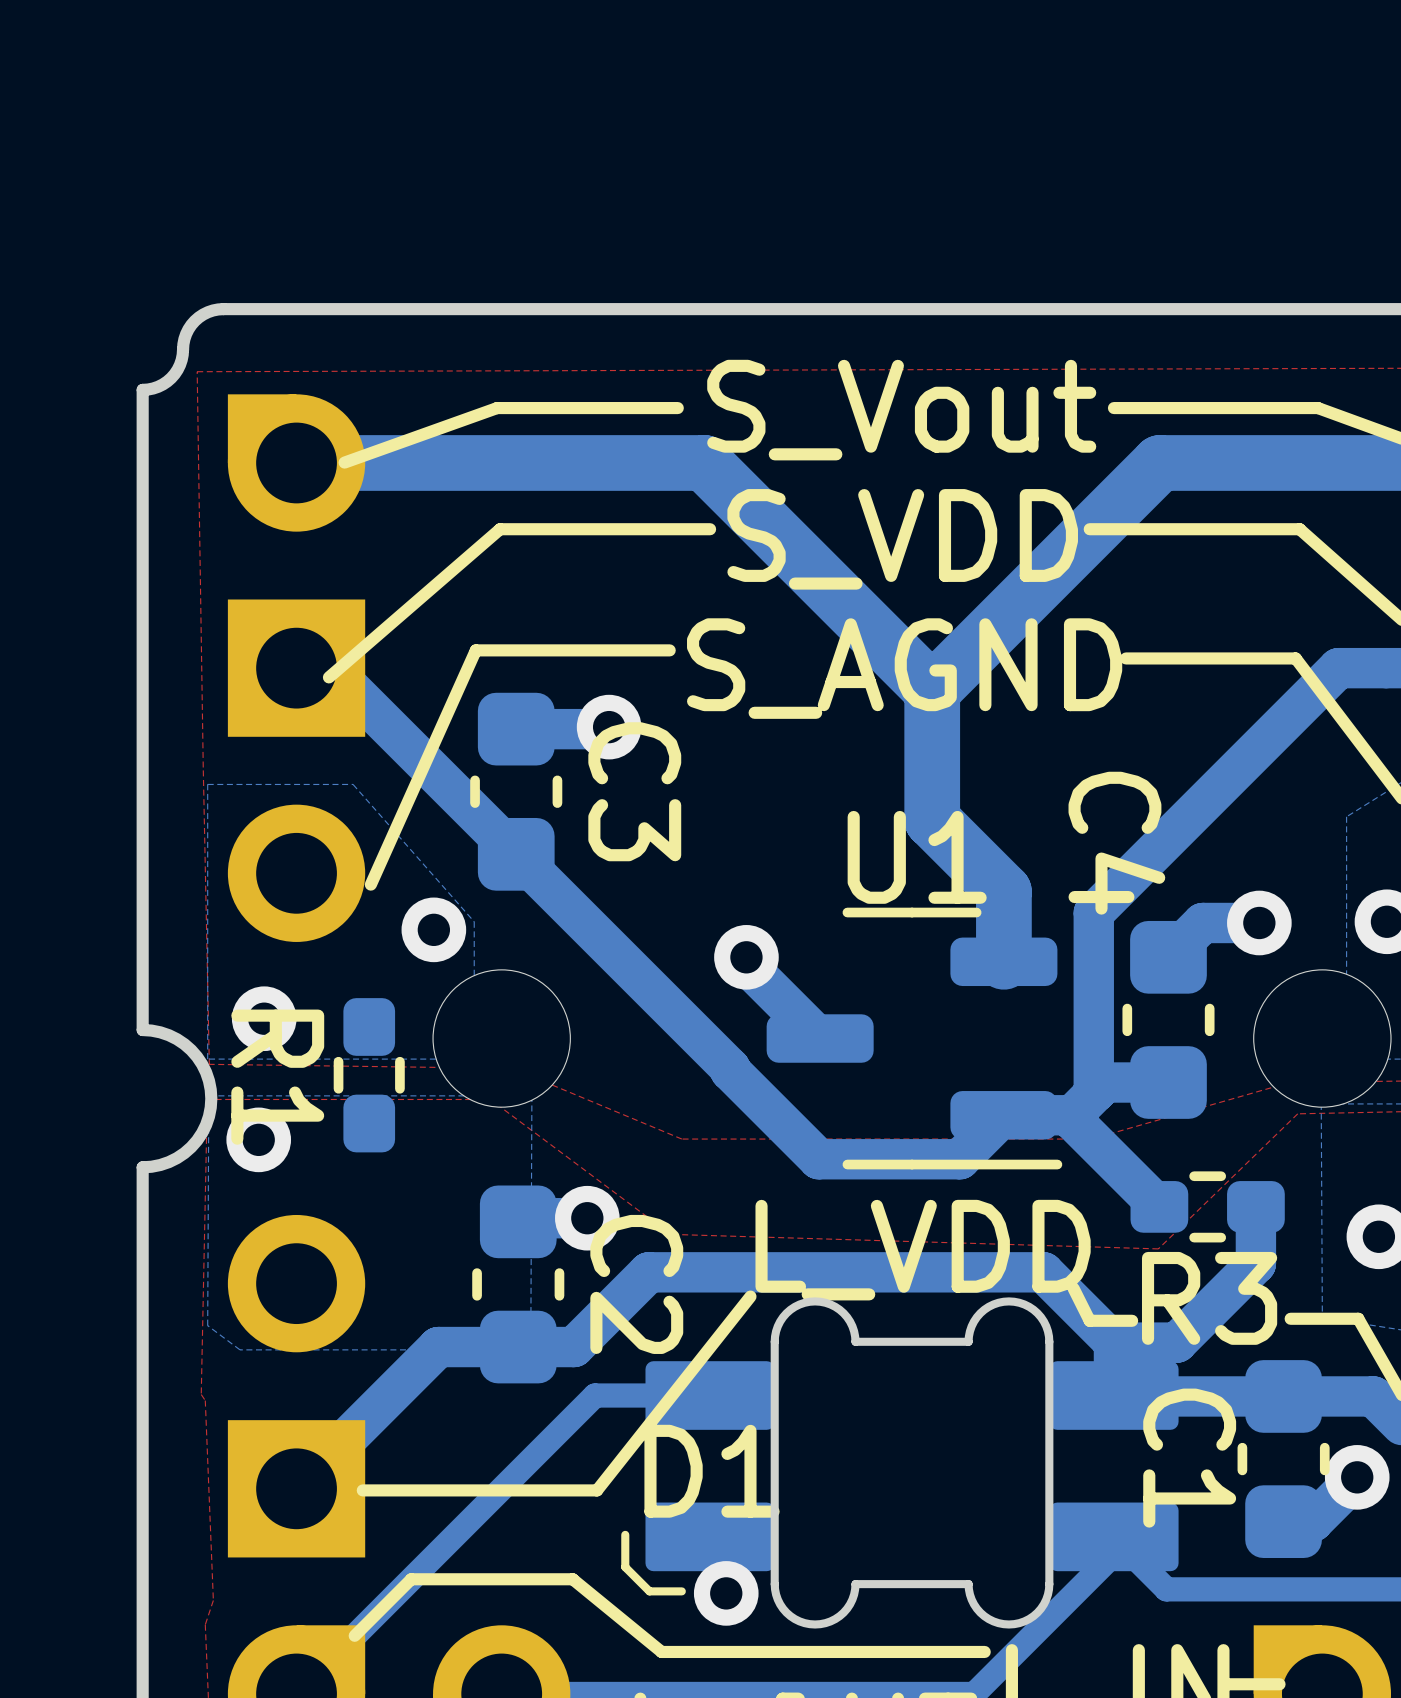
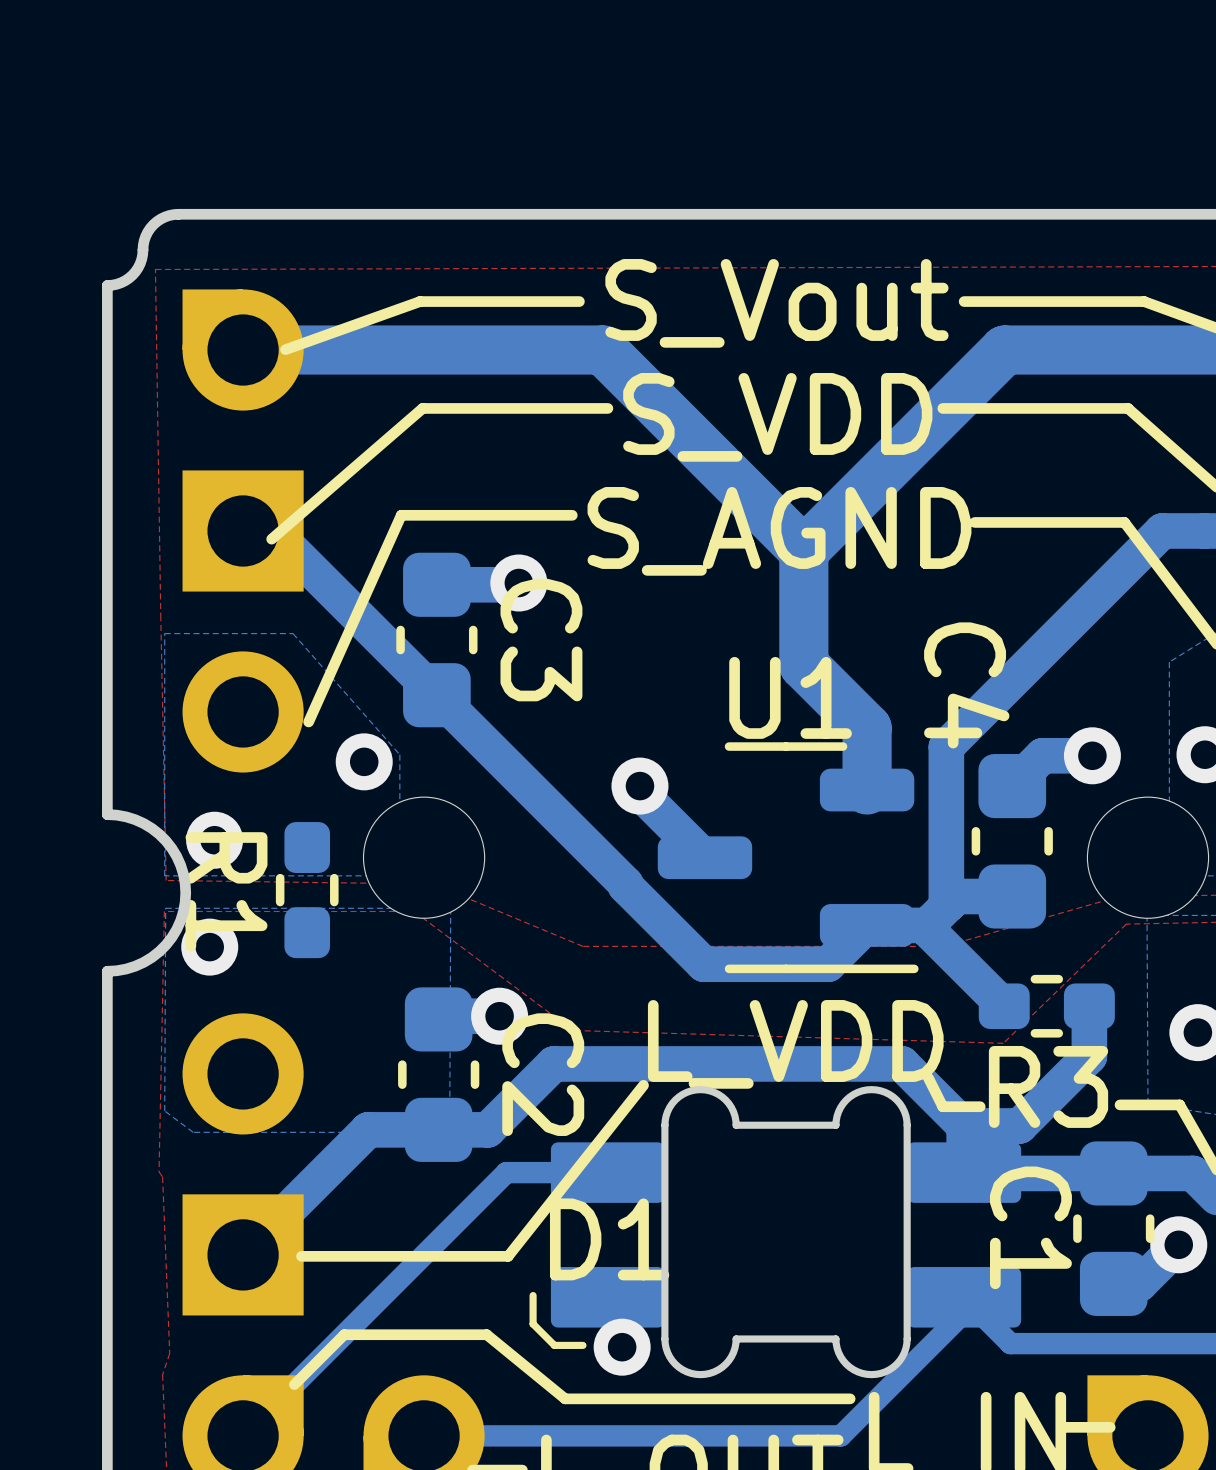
board edge: (142, 989) (142, 1030) (168, 1035) (191, 1050) (206, 1072) (211, 1098) (206, 1124) (191, 1147) (168, 1162) (142, 1167) -> (107, 814) (135, 819) (159, 834) (171, 848) (180, 865) (185, 892) (180, 920) (171, 937) (159, 951) (135, 966) (107, 971)

